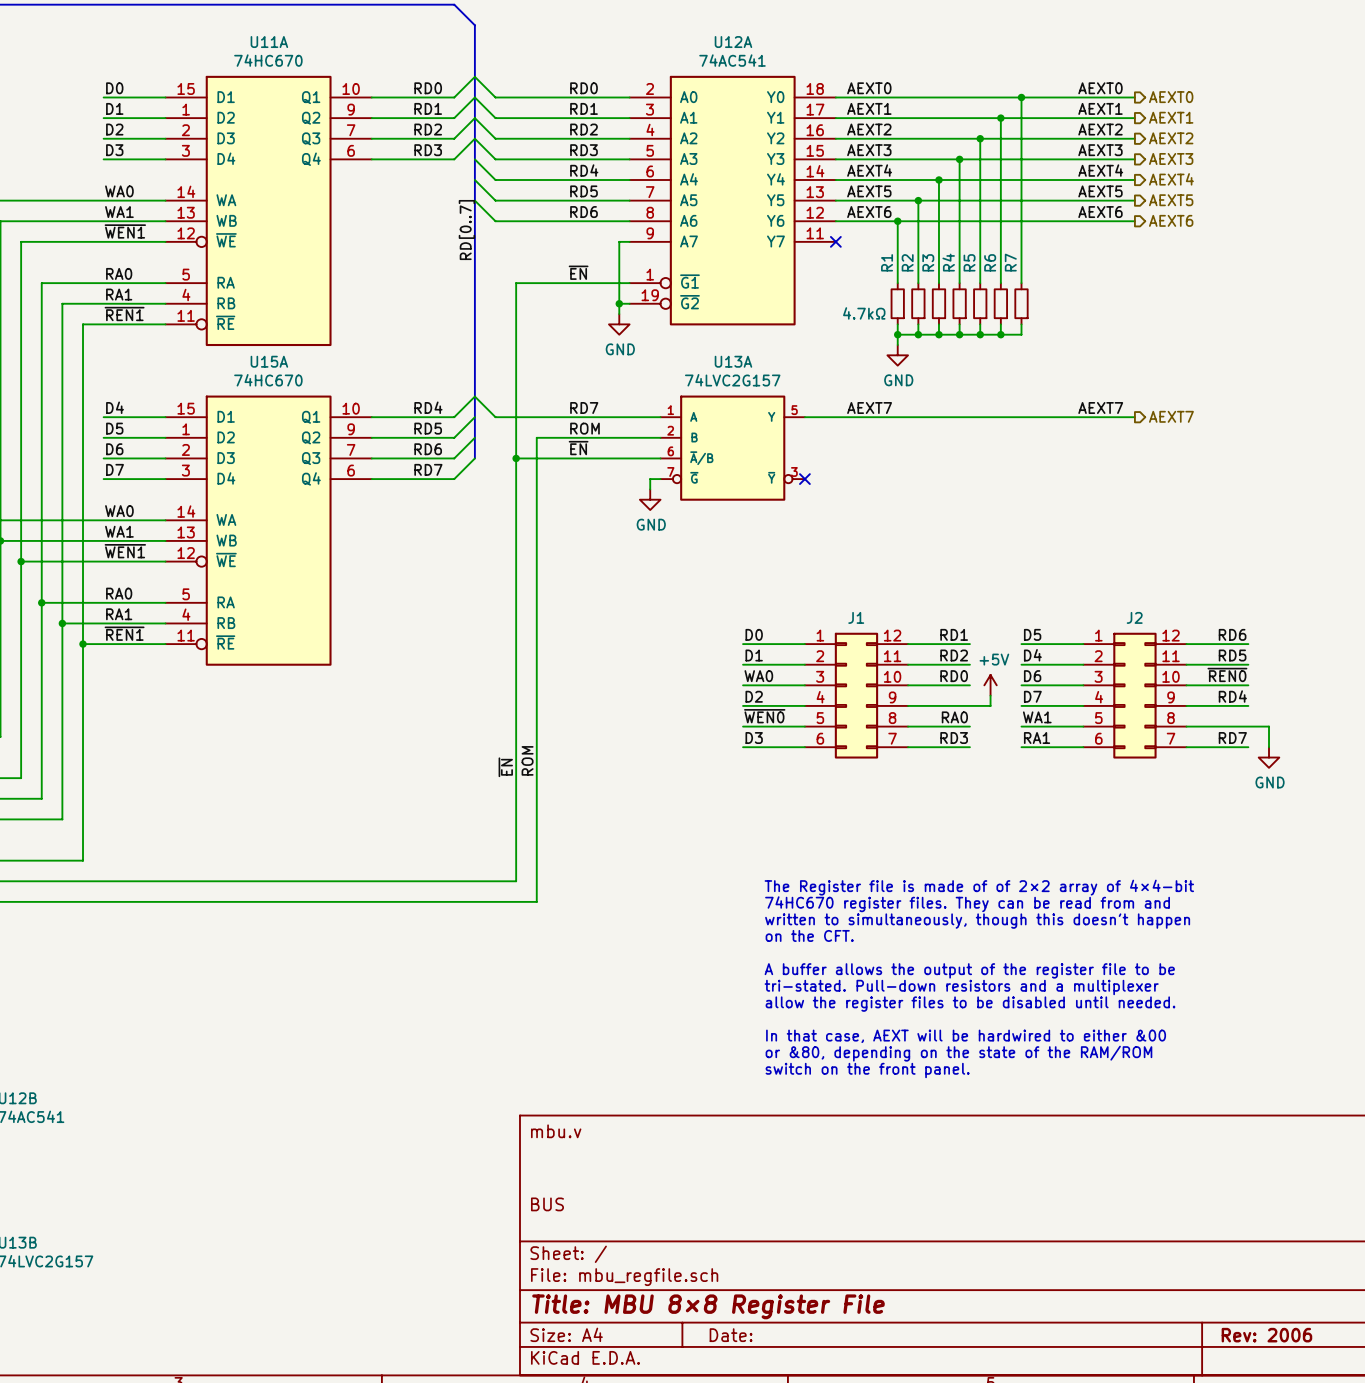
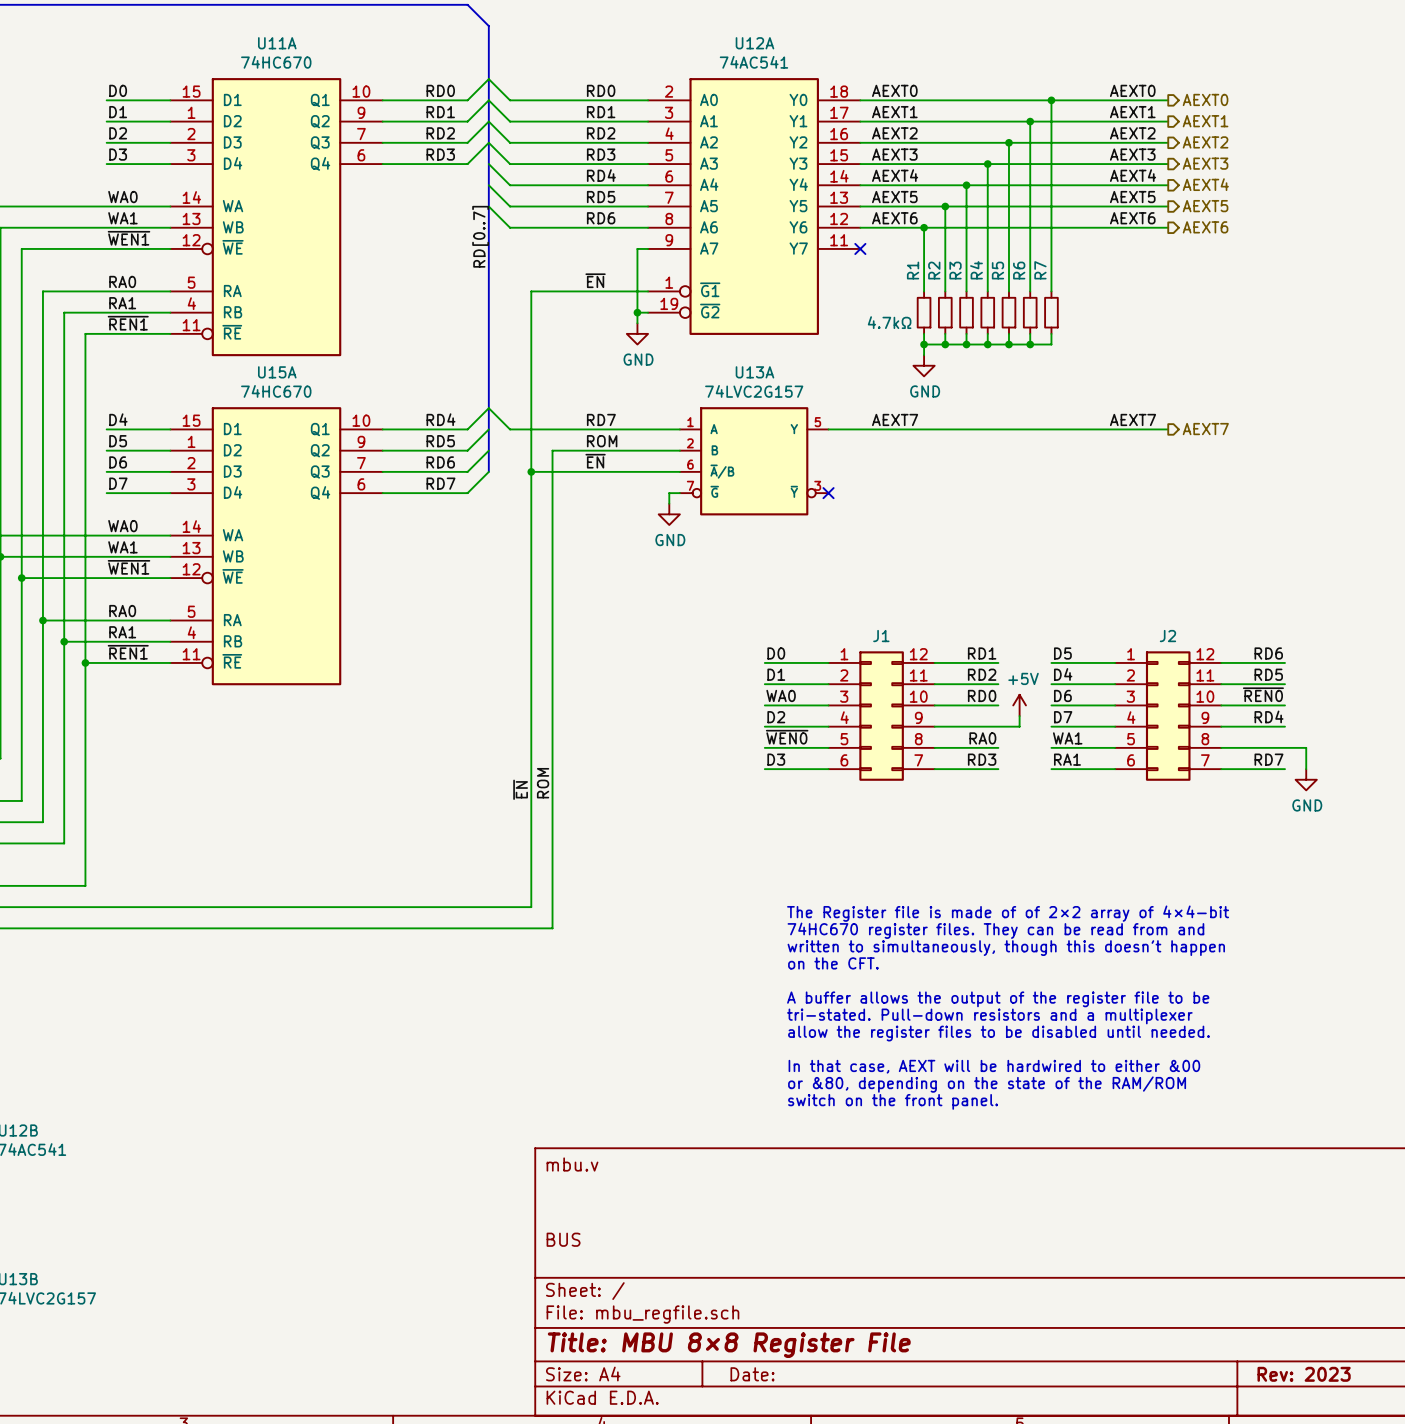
title block: Rev: 2006 (1266, 1335) -> Rev: 2023 (1304, 1374)

